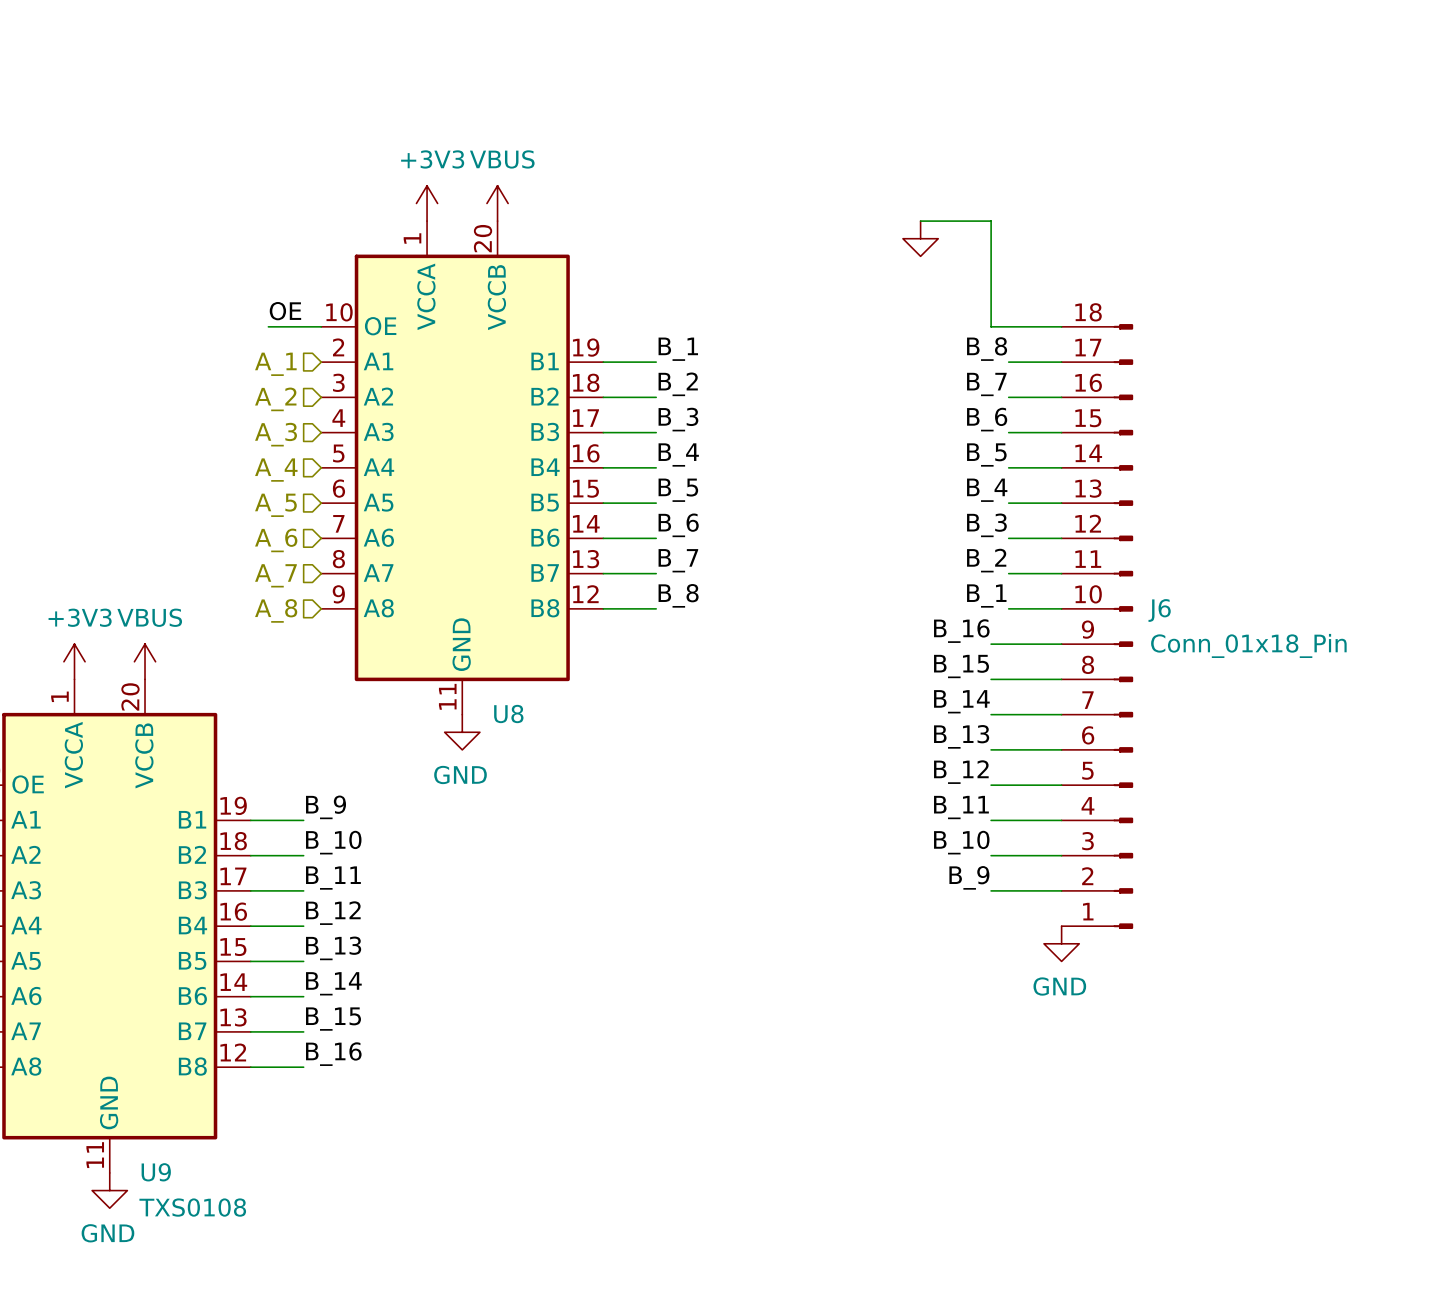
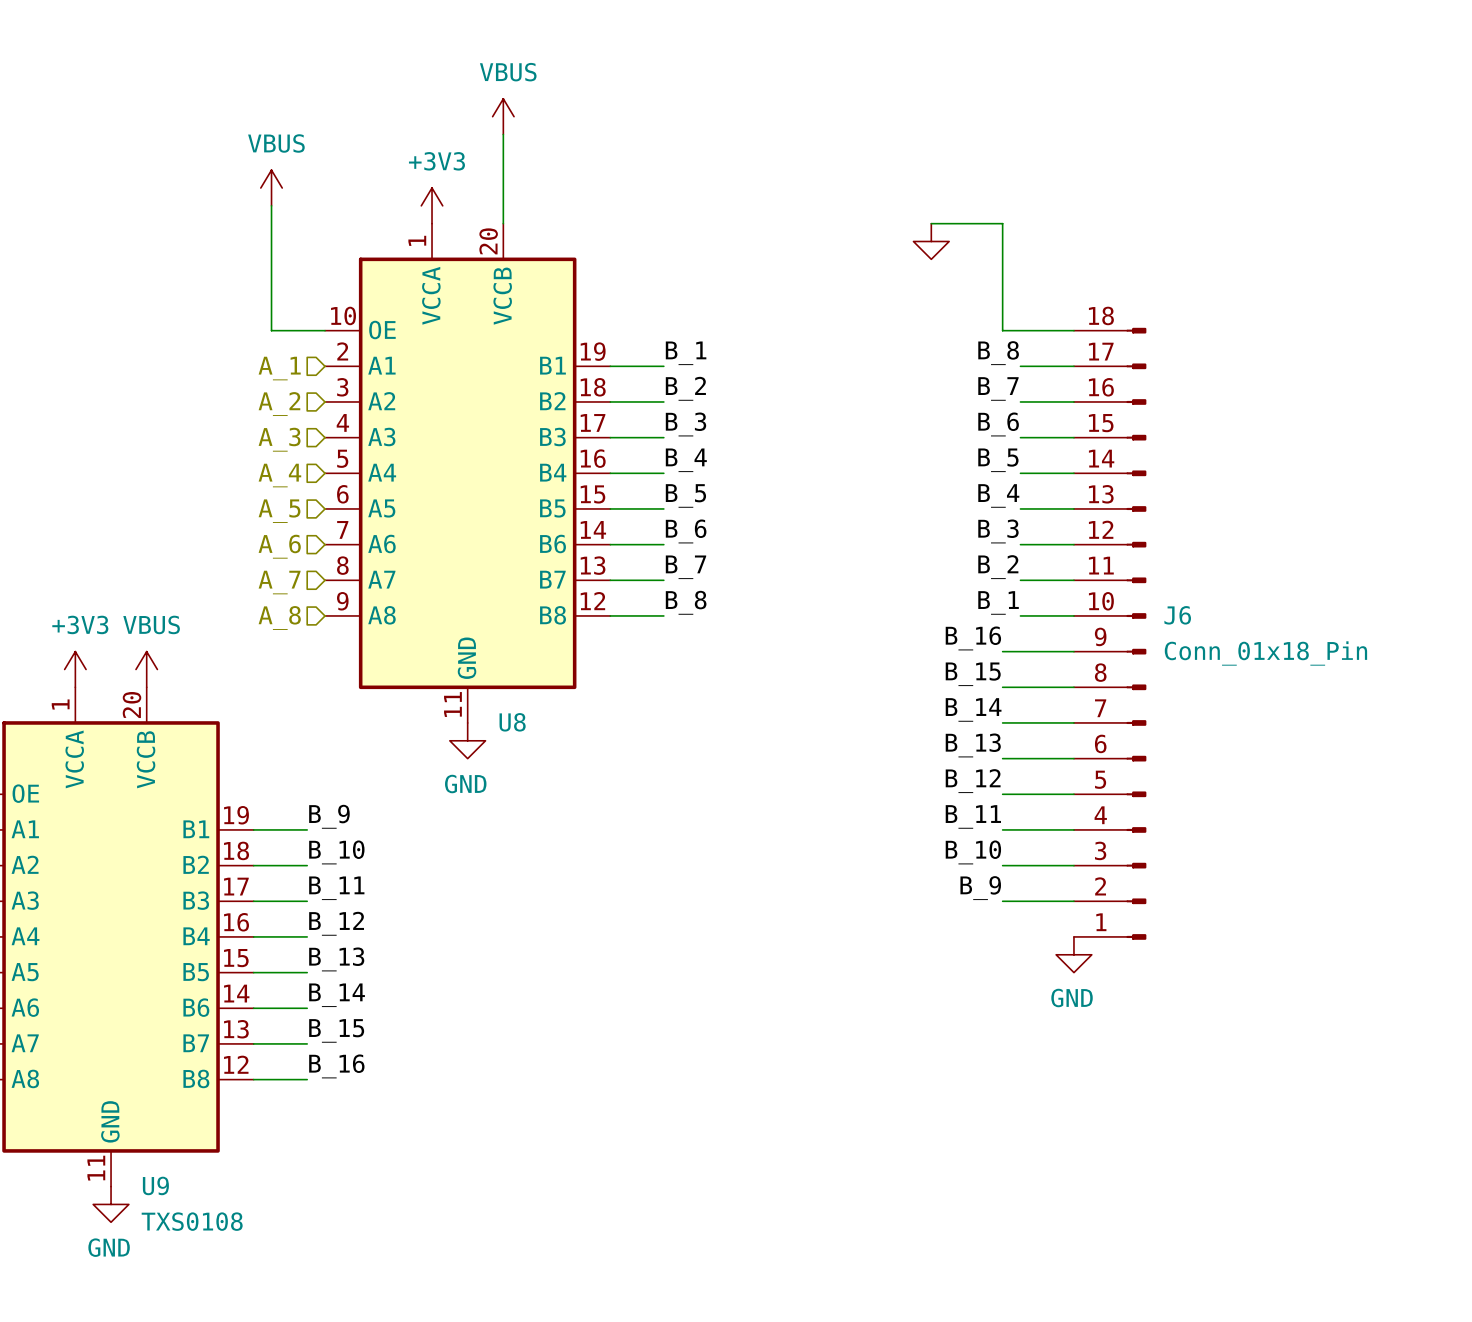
wire: none -> (503, 134) (503, 223)
power symbol: none -> VBUS (271, 188)
wire: none -> (271, 205) (271, 330)
power symbol position: VBUS (497, 203) -> VBUS (503, 116)
label: OE (285, 311) -> none

